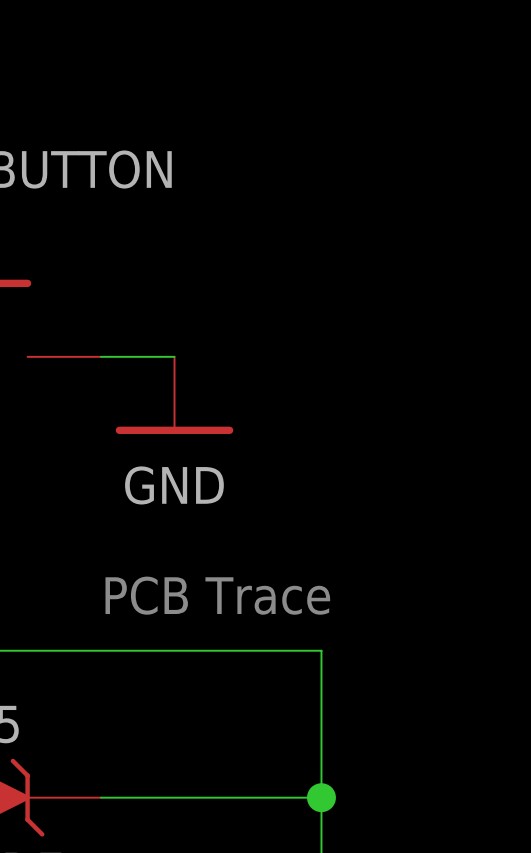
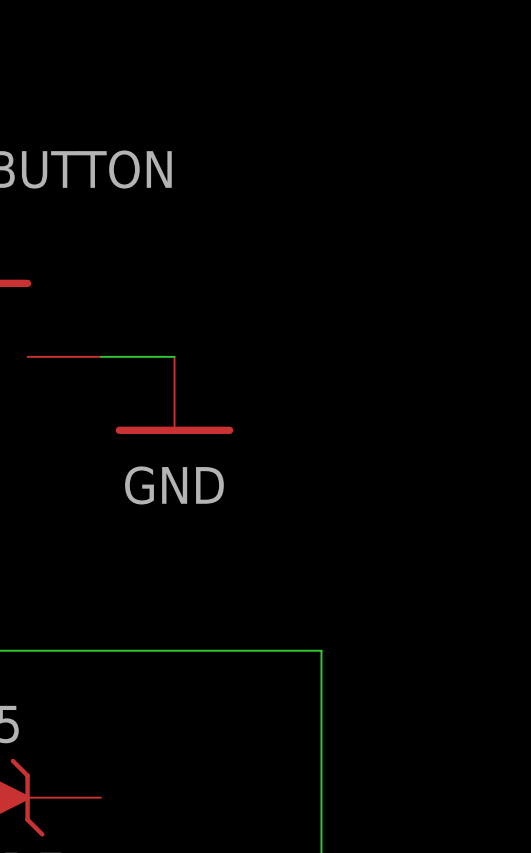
text: PCB Trace (217, 595) -> none
wire: (101, 797) (321, 797) -> none
junction: (321, 797) -> none

